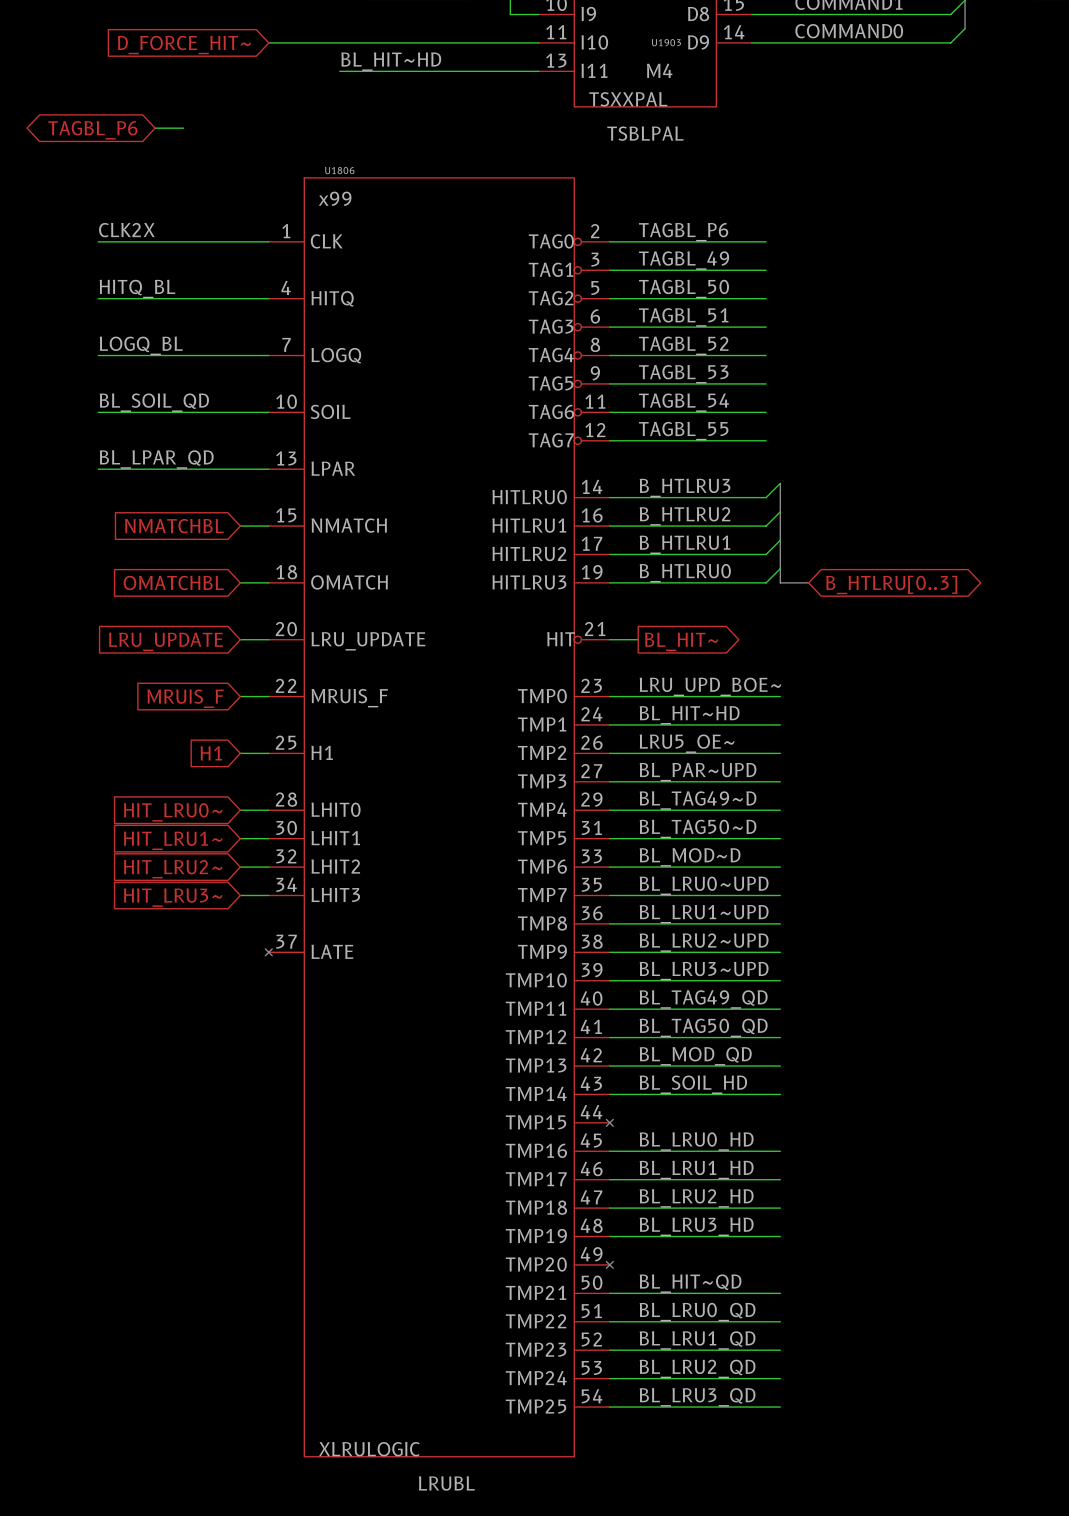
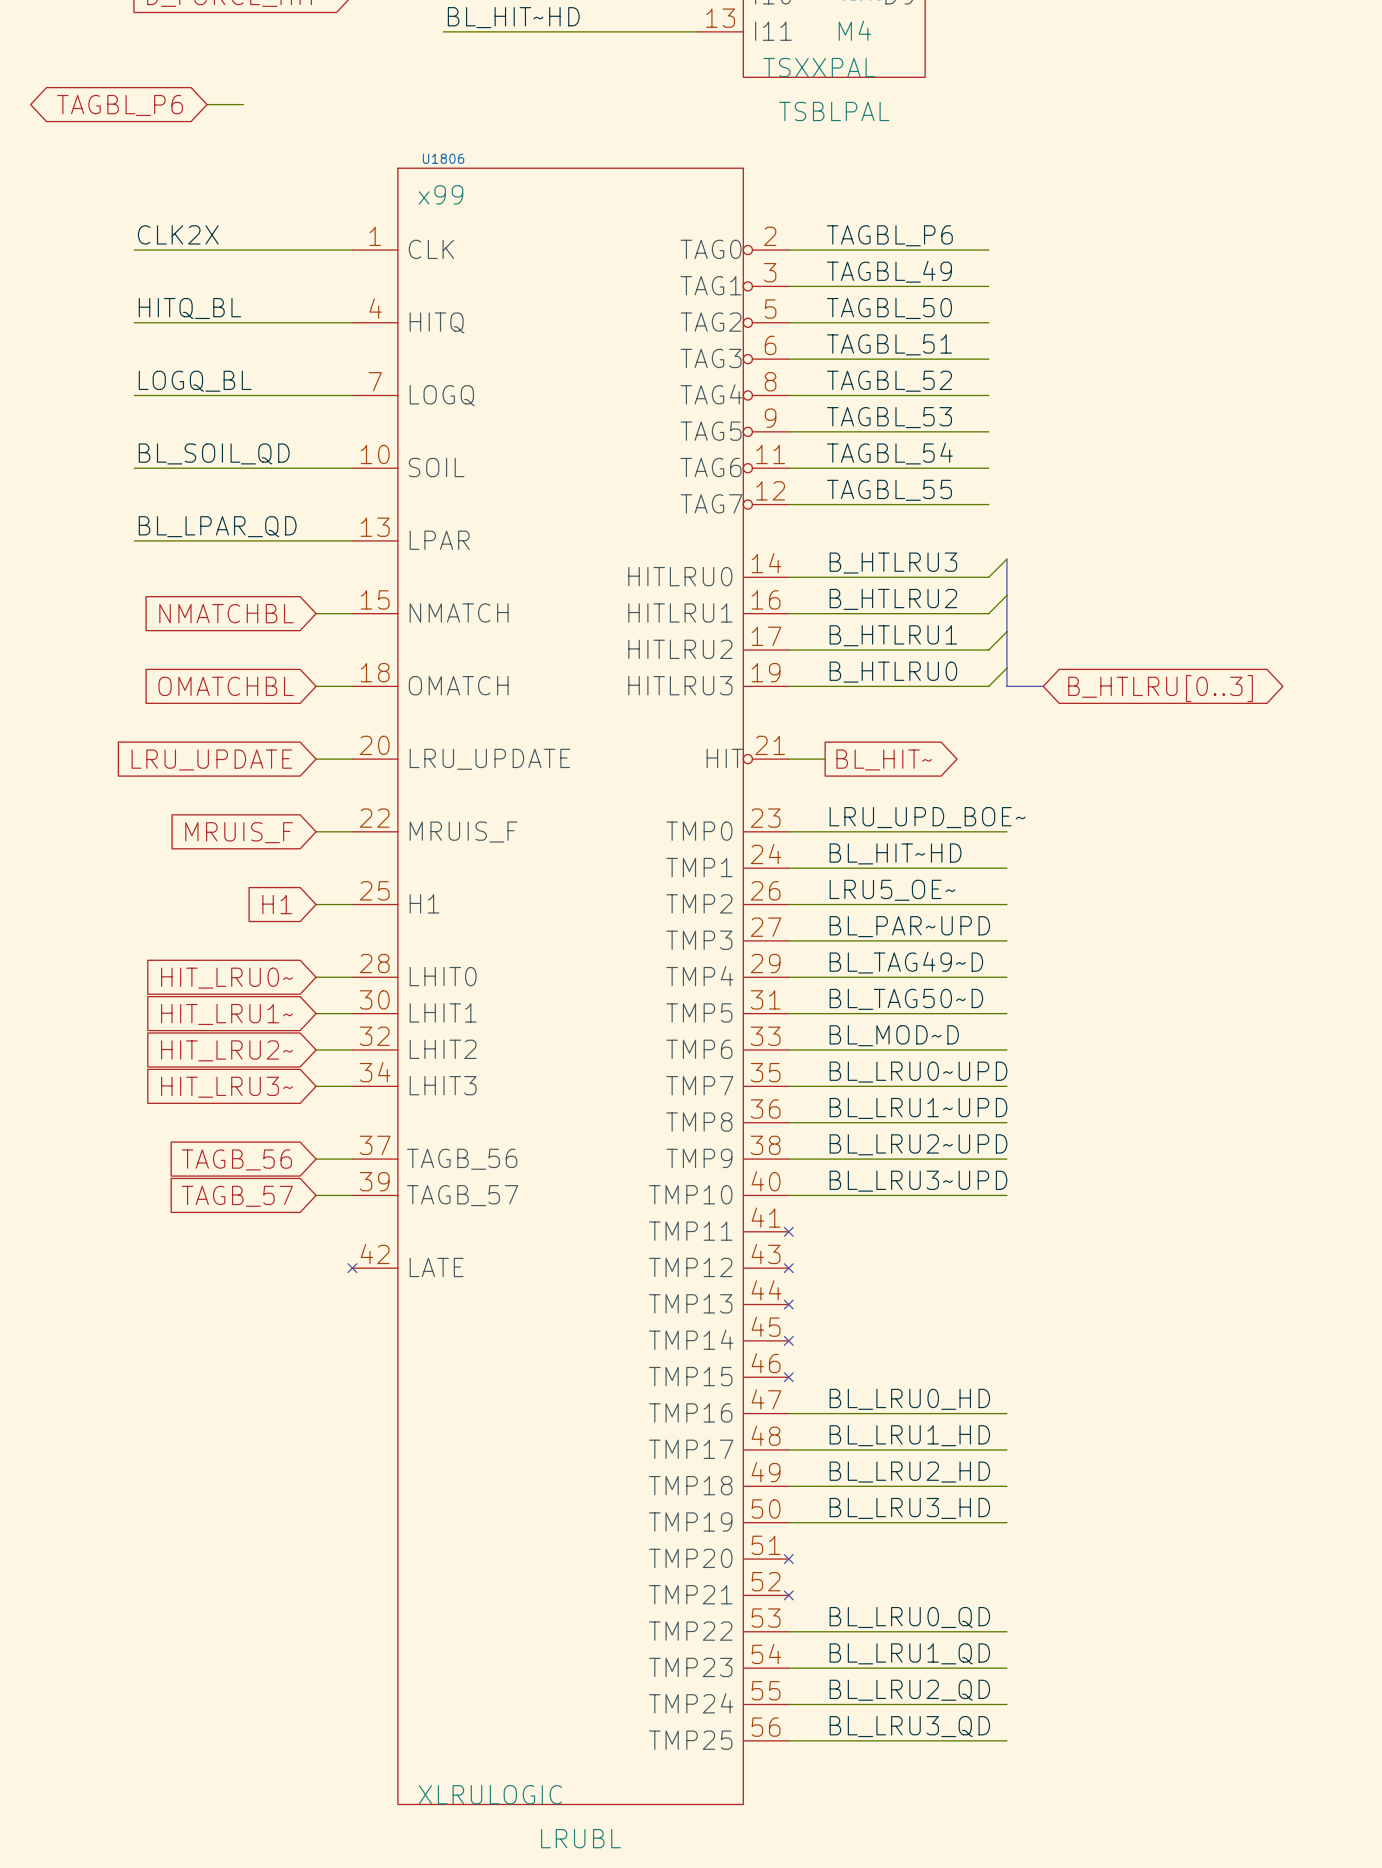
U1806 symbol: [268, 177, 610, 1457] -> [352, 168, 789, 1805]
wire: none -> (316, 1159) (352, 1159)
no-connect mark: (268, 952) -> none
global label: none -> TAGB_56 (236, 1159)
wire: none -> (316, 1195) (352, 1195)
global label: none -> TAGB_57 (237, 1196)
label: BL_TAG49_QD (703, 999) -> none
wire: (609, 1009) (780, 1009) -> none
no-connect mark: none -> (788, 1231)
label: BL_TAG50_QD (703, 1027) -> none
no-connect mark: none -> (352, 1268)
wire: (609, 1037) (780, 1037) -> none
no-connect mark: none -> (788, 1268)
label: BL_MOD_QD (695, 1056) -> none
wire: (609, 1065) (780, 1065) -> none
no-connect mark: none -> (788, 1304)
label: BL_SOIL_HD (693, 1084) -> none
wire: (609, 1094) (780, 1094) -> none
no-connect mark: none -> (788, 1340)
label: BL_HIT~QD (690, 1283) -> none
wire: (609, 1293) (780, 1293) -> none
no-connect mark: none -> (788, 1595)

